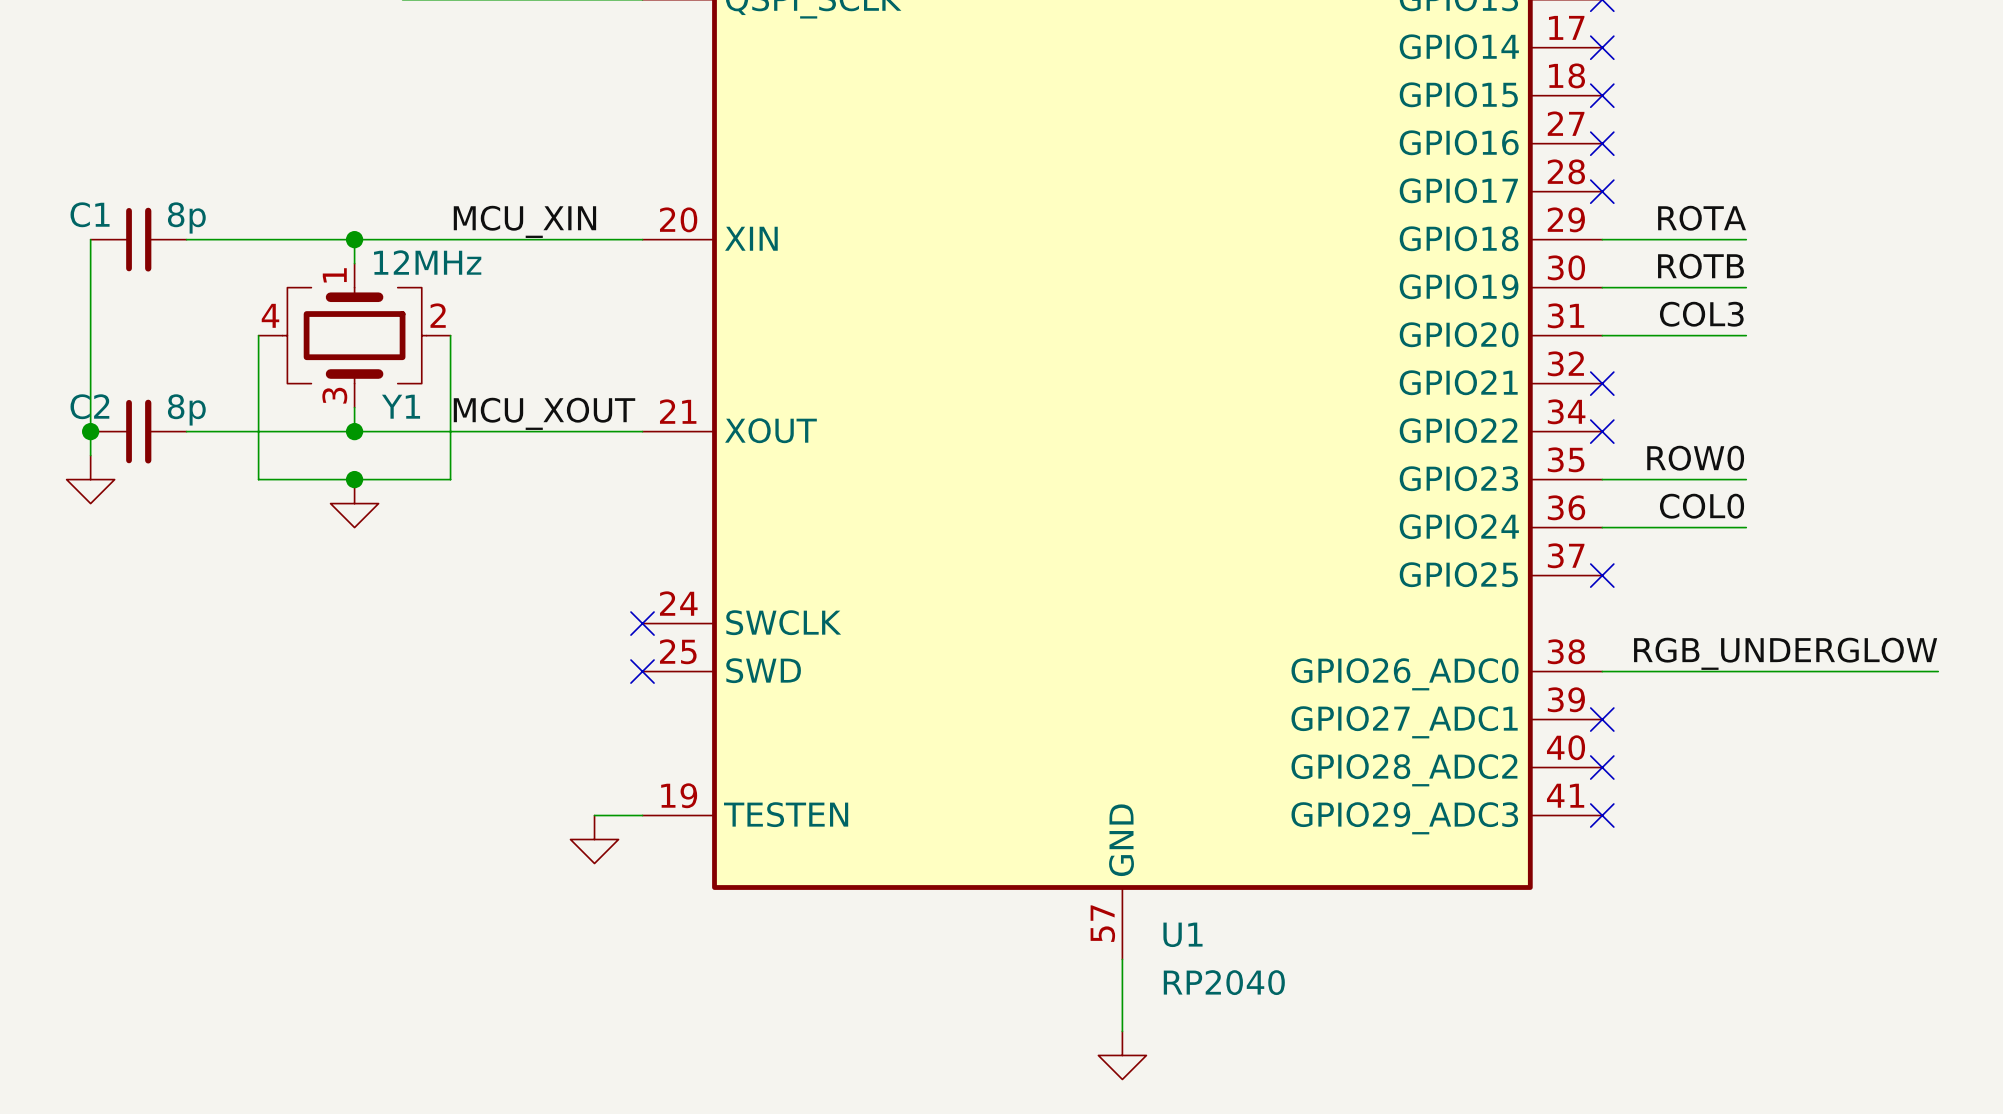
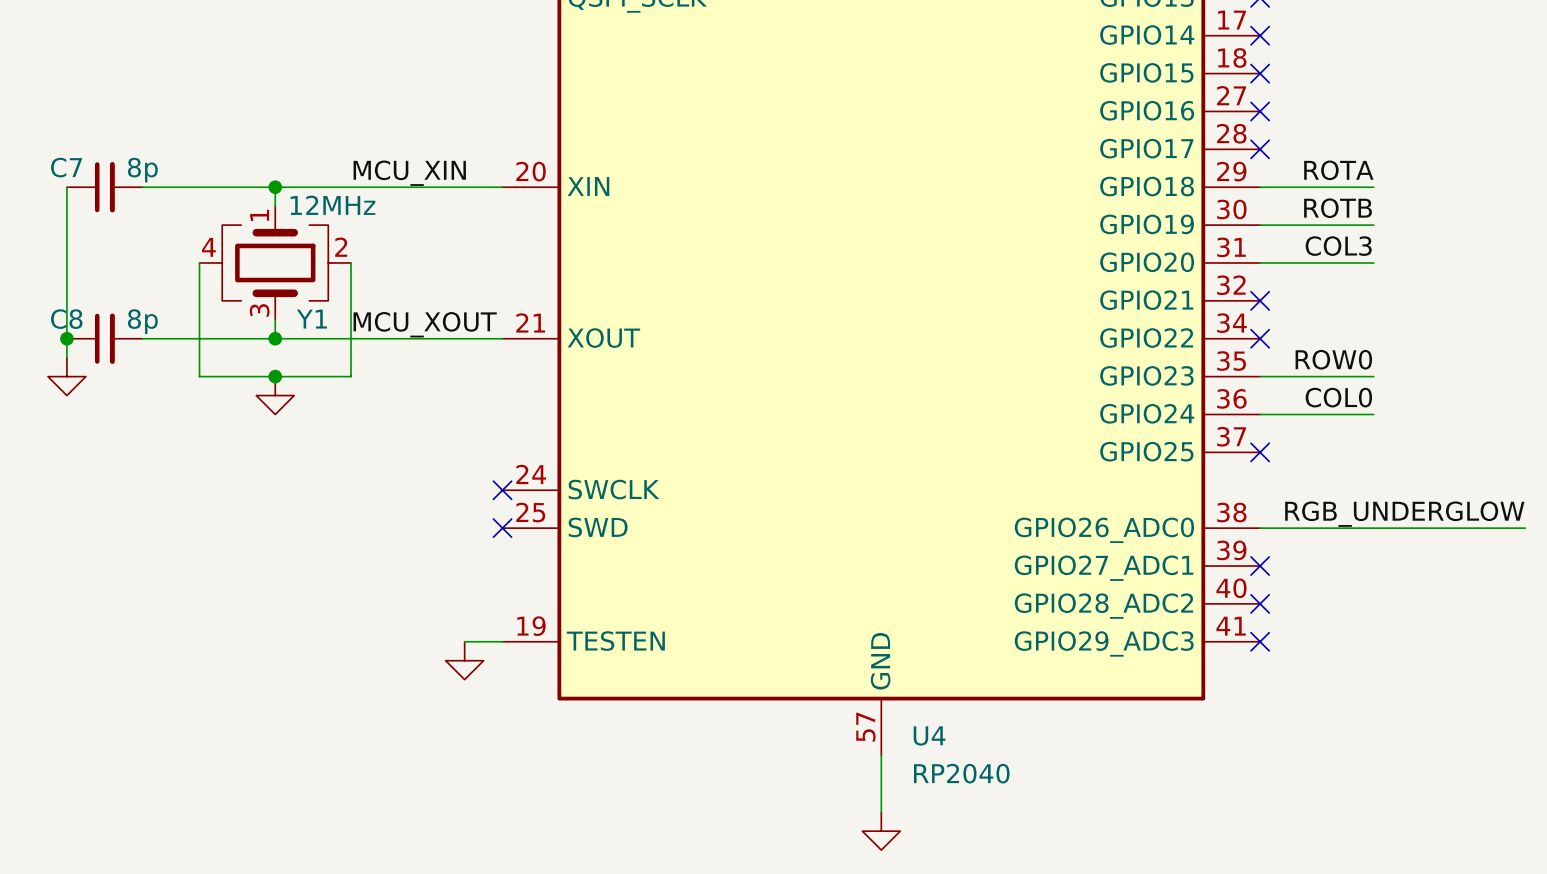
C1 name: C1 (90, 214) -> C7 (66, 167)
C2 name: C2 (89, 406) -> C8 (66, 319)
U1 name: U1 (1182, 934) -> U4 (929, 735)

